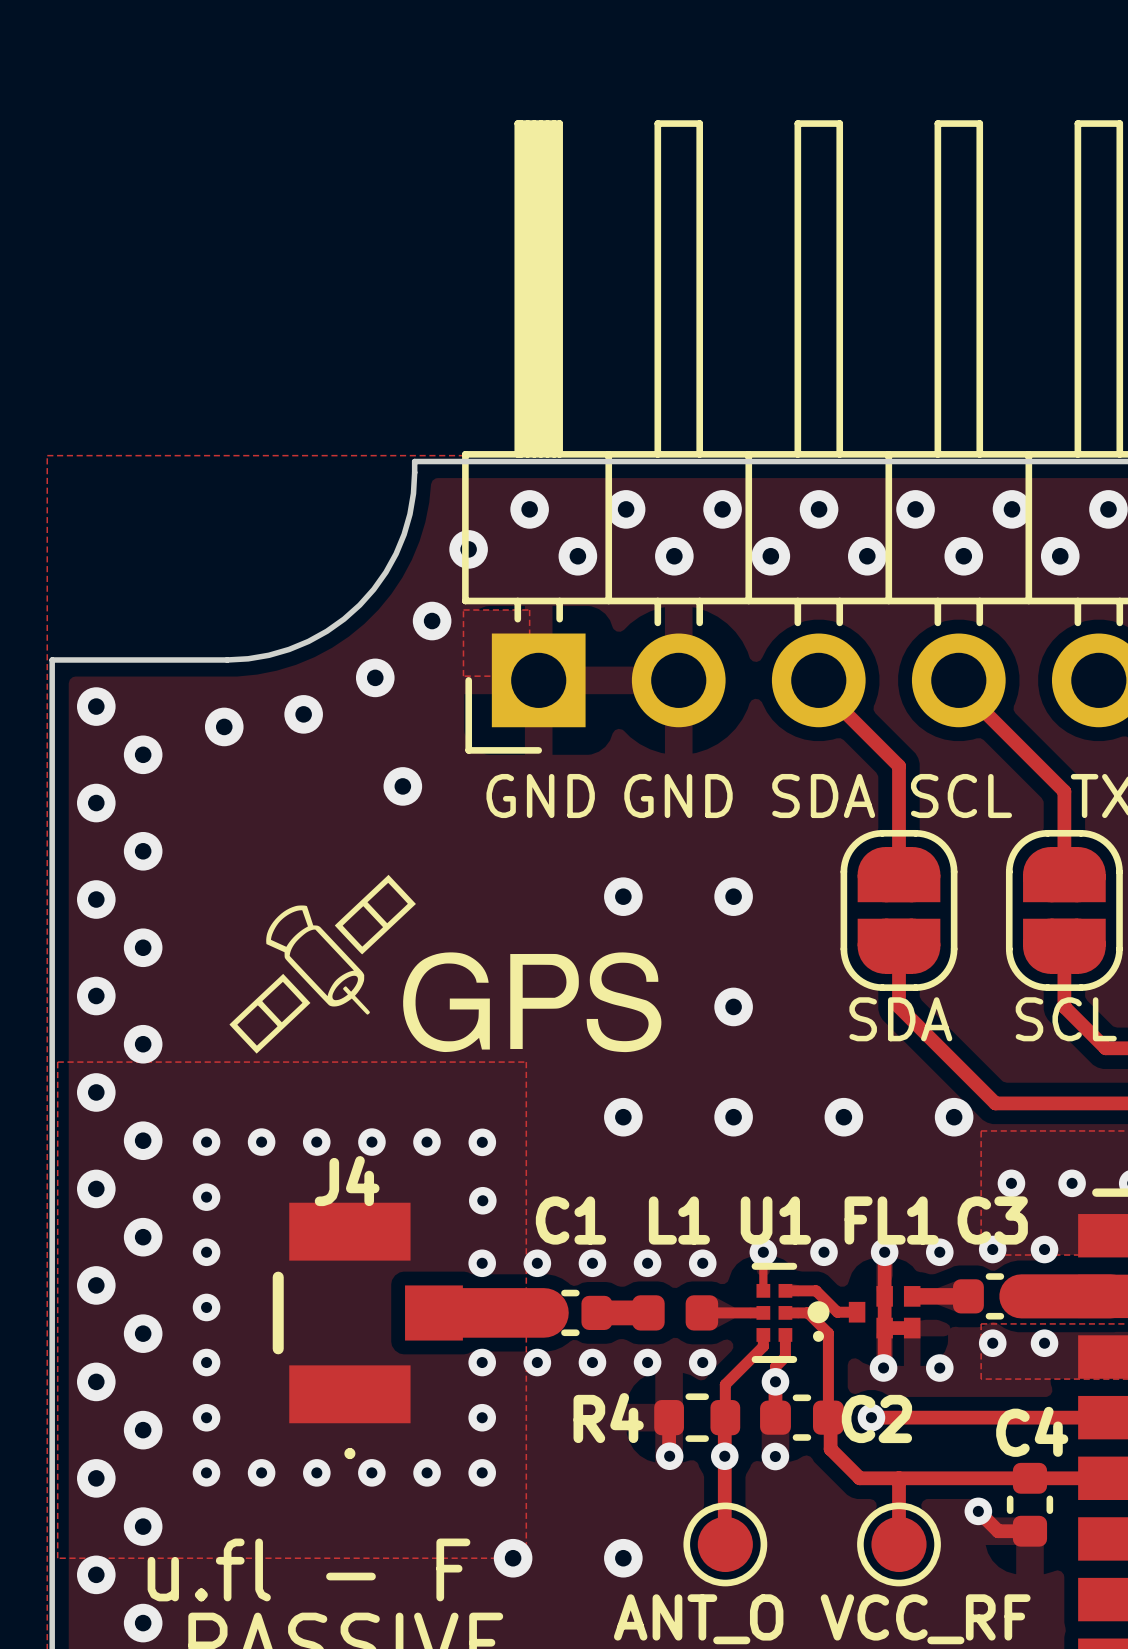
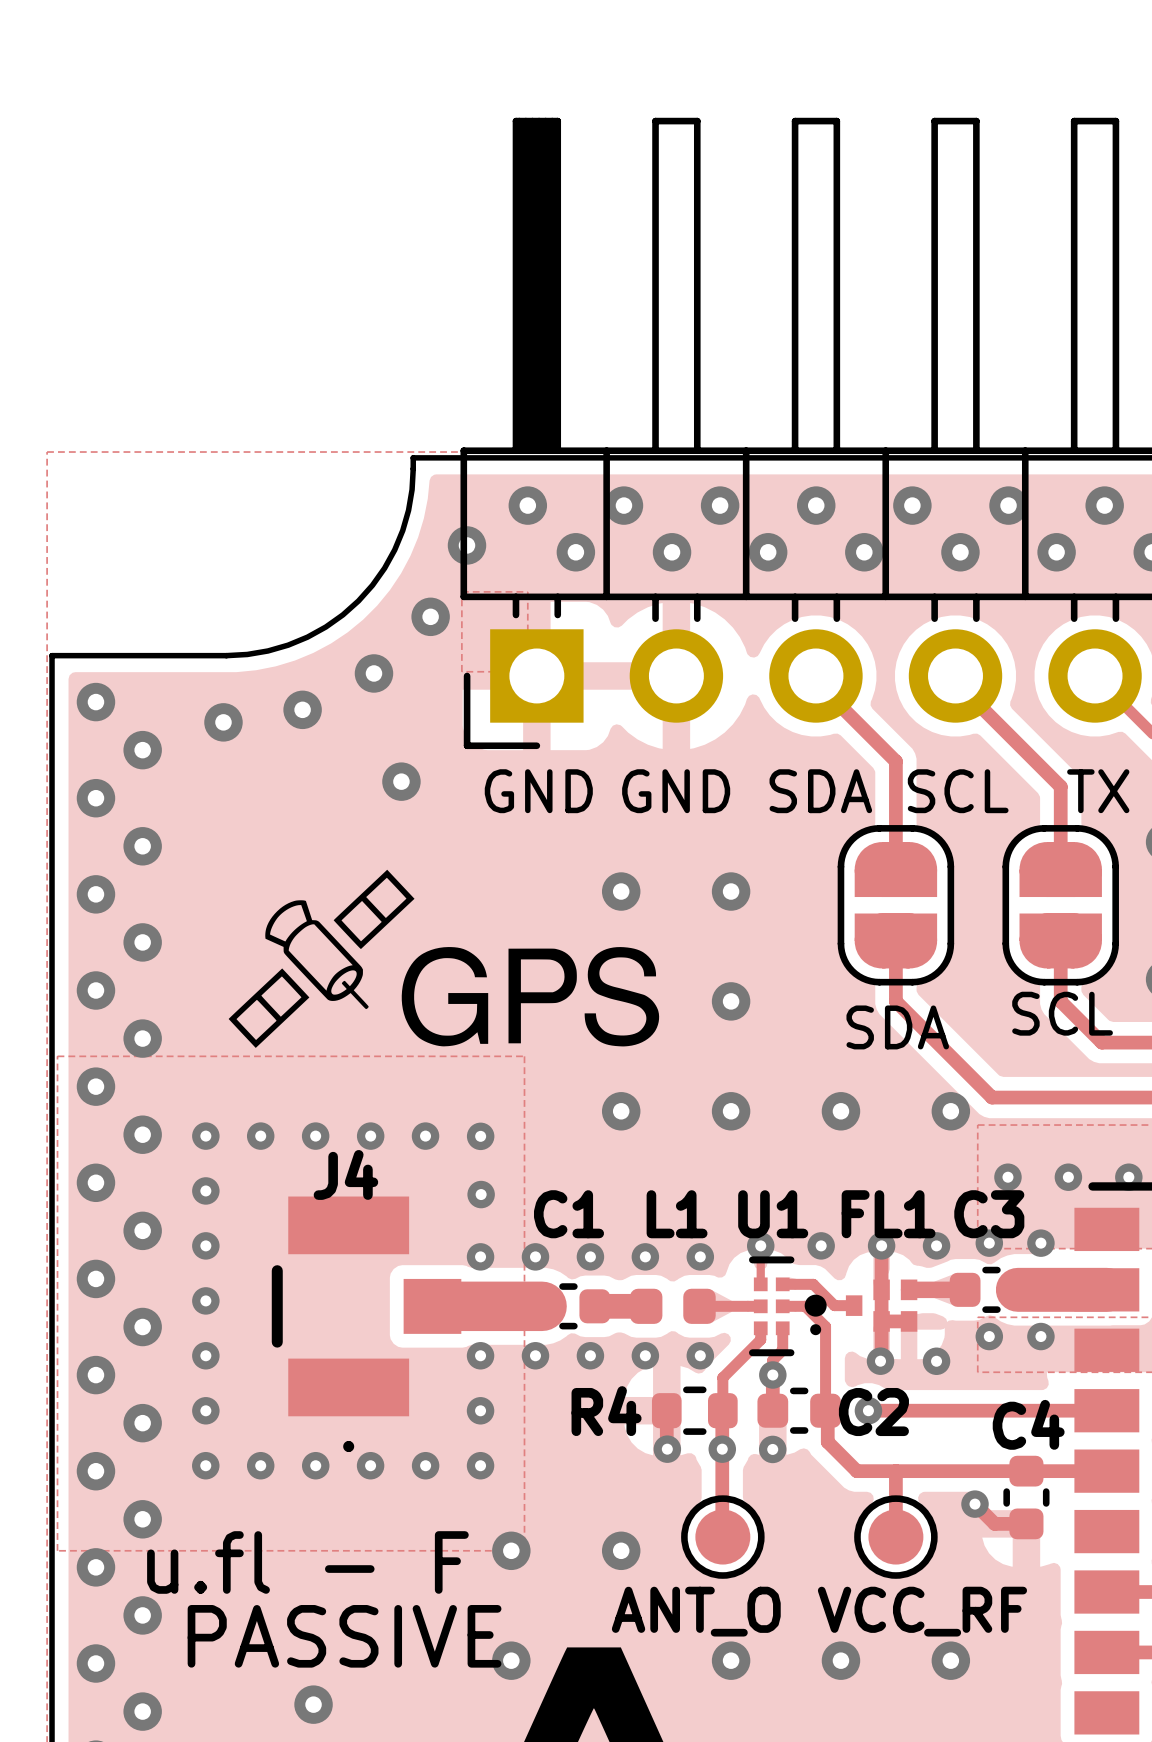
zone outline: (463, 610) (529, 610) -> (461, 605) (461, 591) (527, 591) (527, 605)
text position: SDA (900, 1019) -> SDA (897, 1027)

